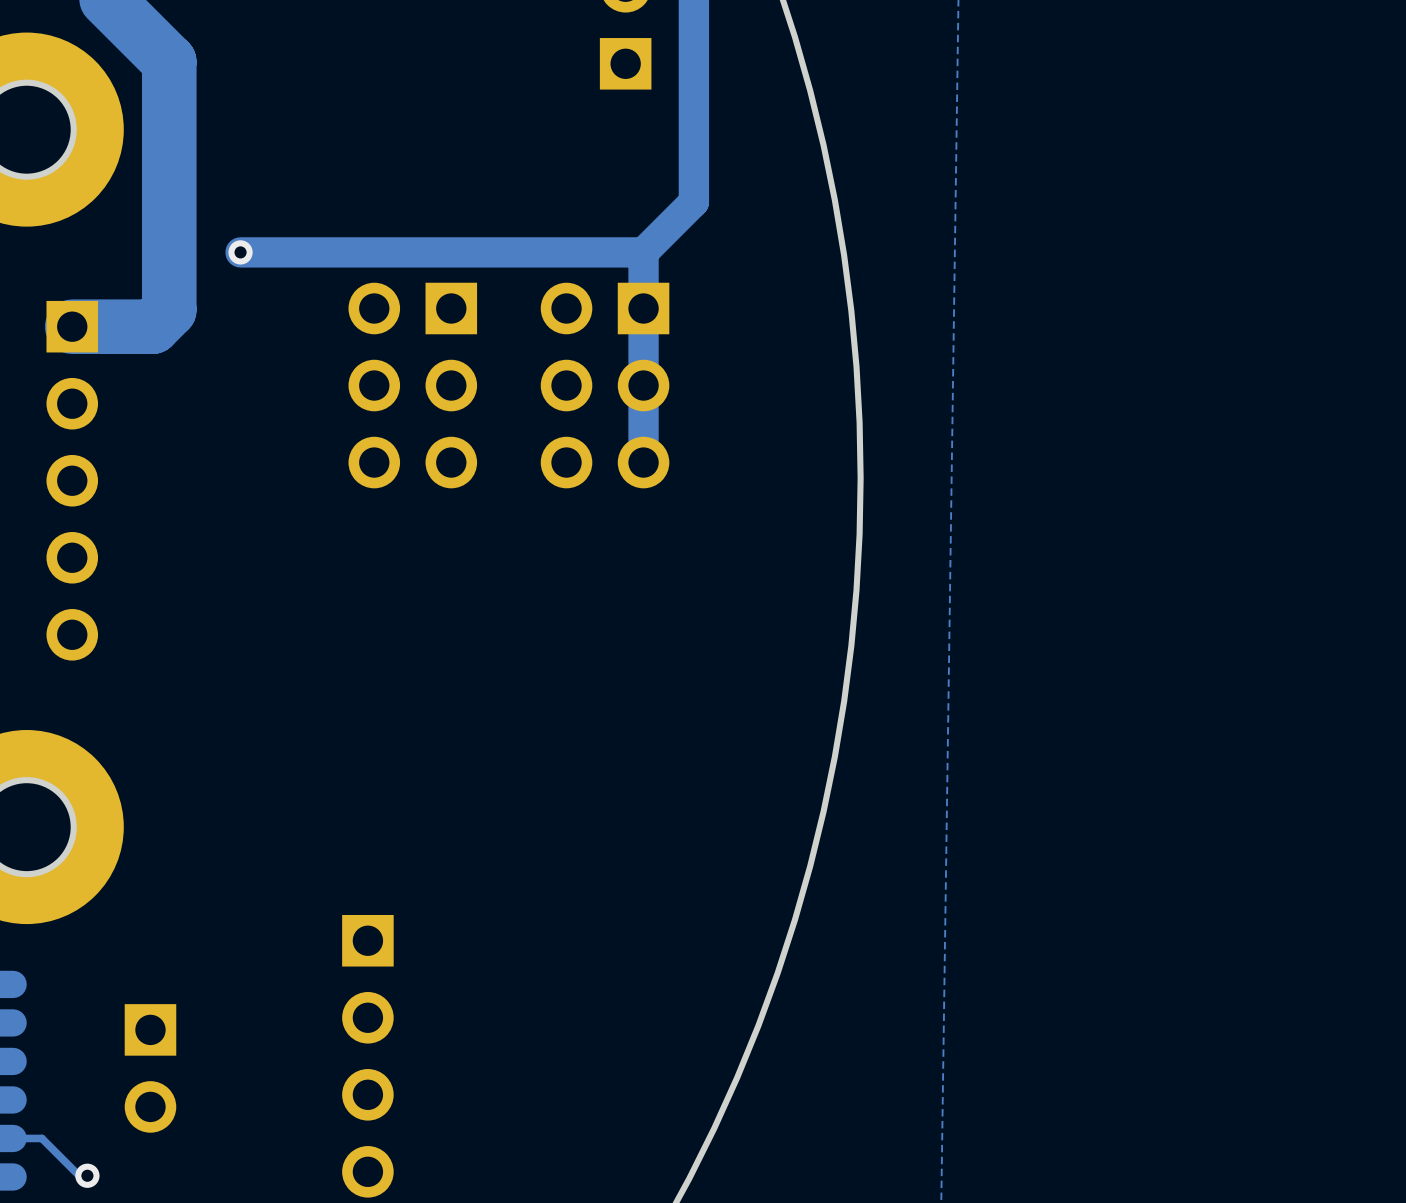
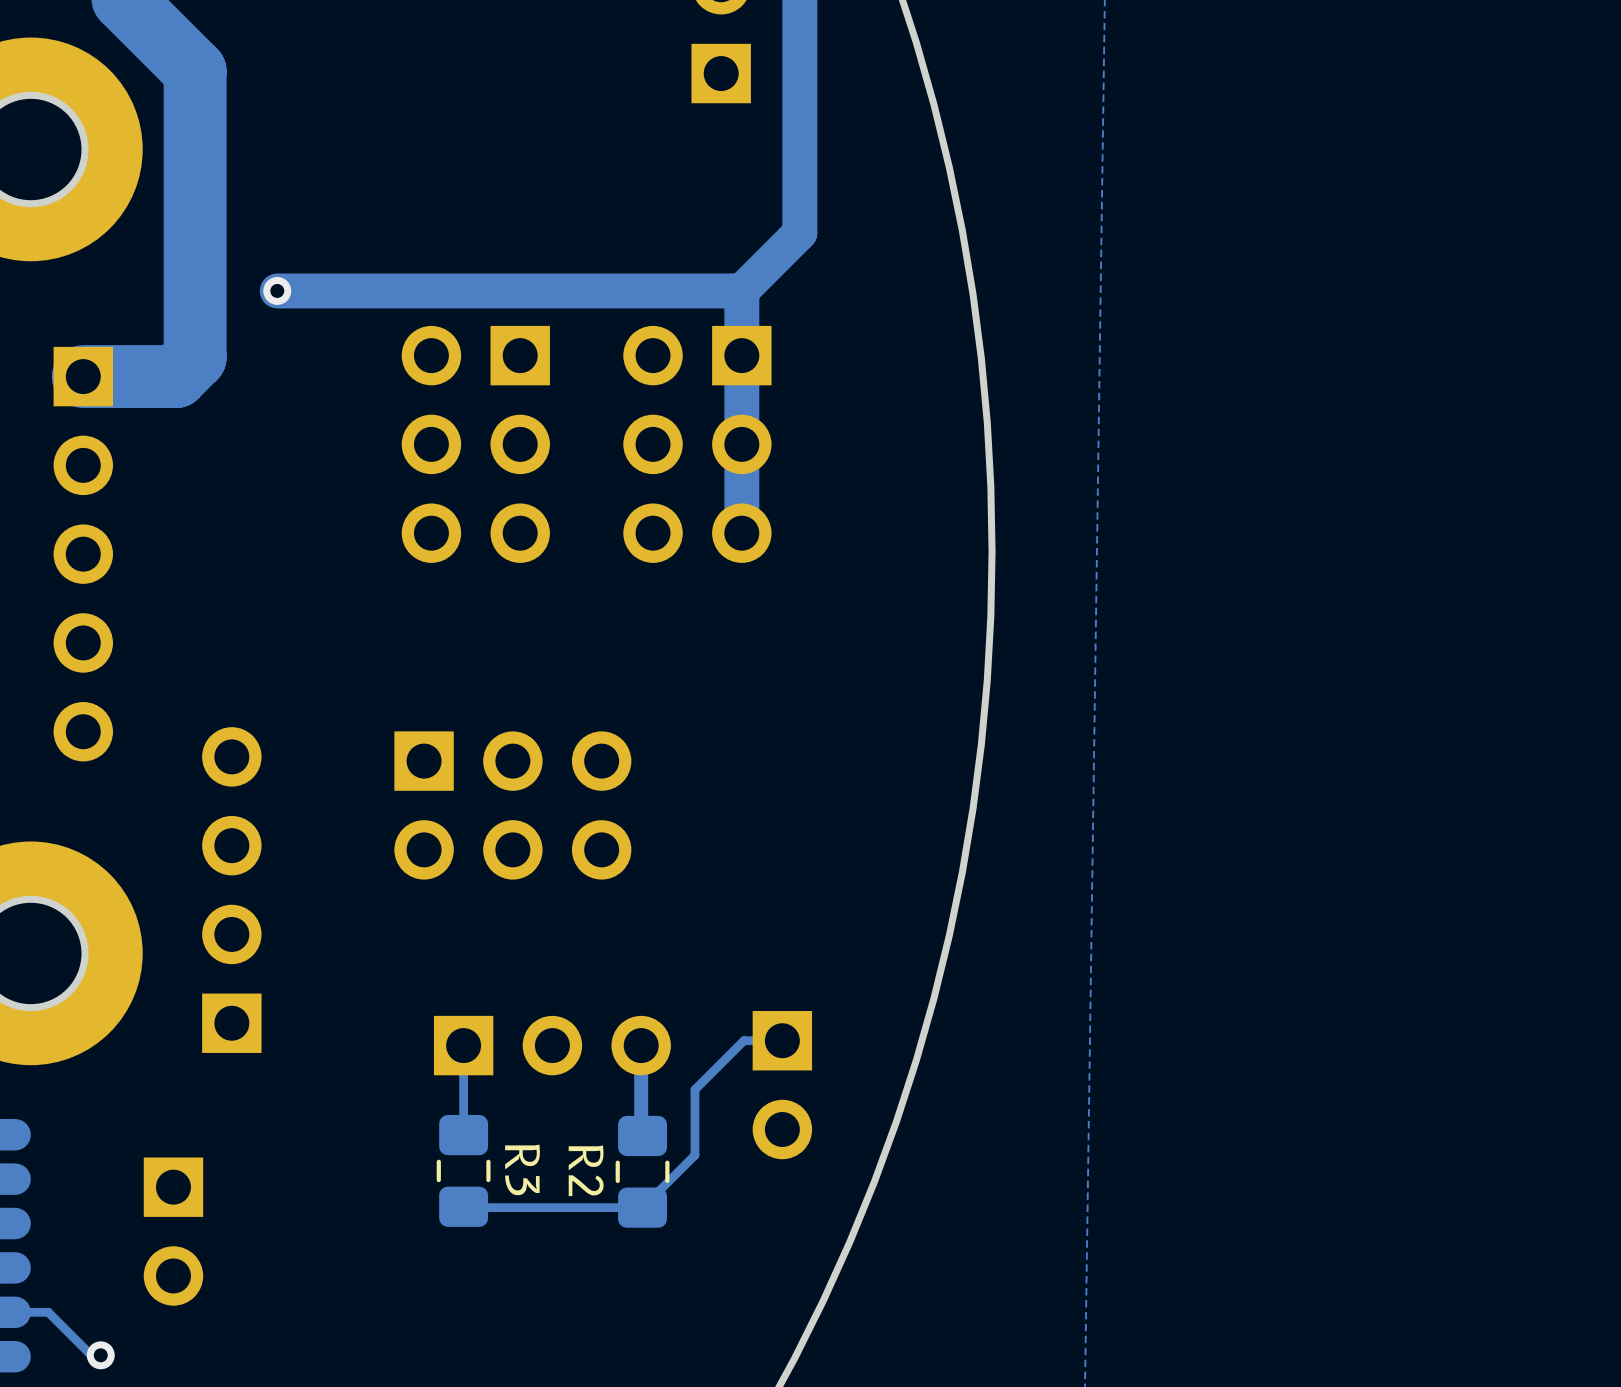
part: none -> (512, 805)
track: none -> (782, 1040) (743, 1040) (694, 1089) (694, 1155) (642, 1207) (463, 1206)
track: none -> (463, 1045) (463, 1135)
part: none -> (552, 1045)
track: none -> (641, 1045) (642, 1135)
part: none -> (782, 1085)
R3: none -> (463, 1170)
R2: none -> (642, 1171)
part rotation: 0° (367, 1056) -> 180° (231, 890)
part position: (367, 1056) -> (231, 890)

